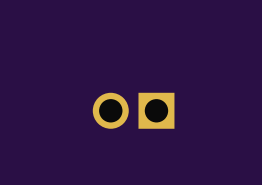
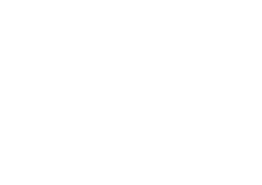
part: (133, 110) -> none

